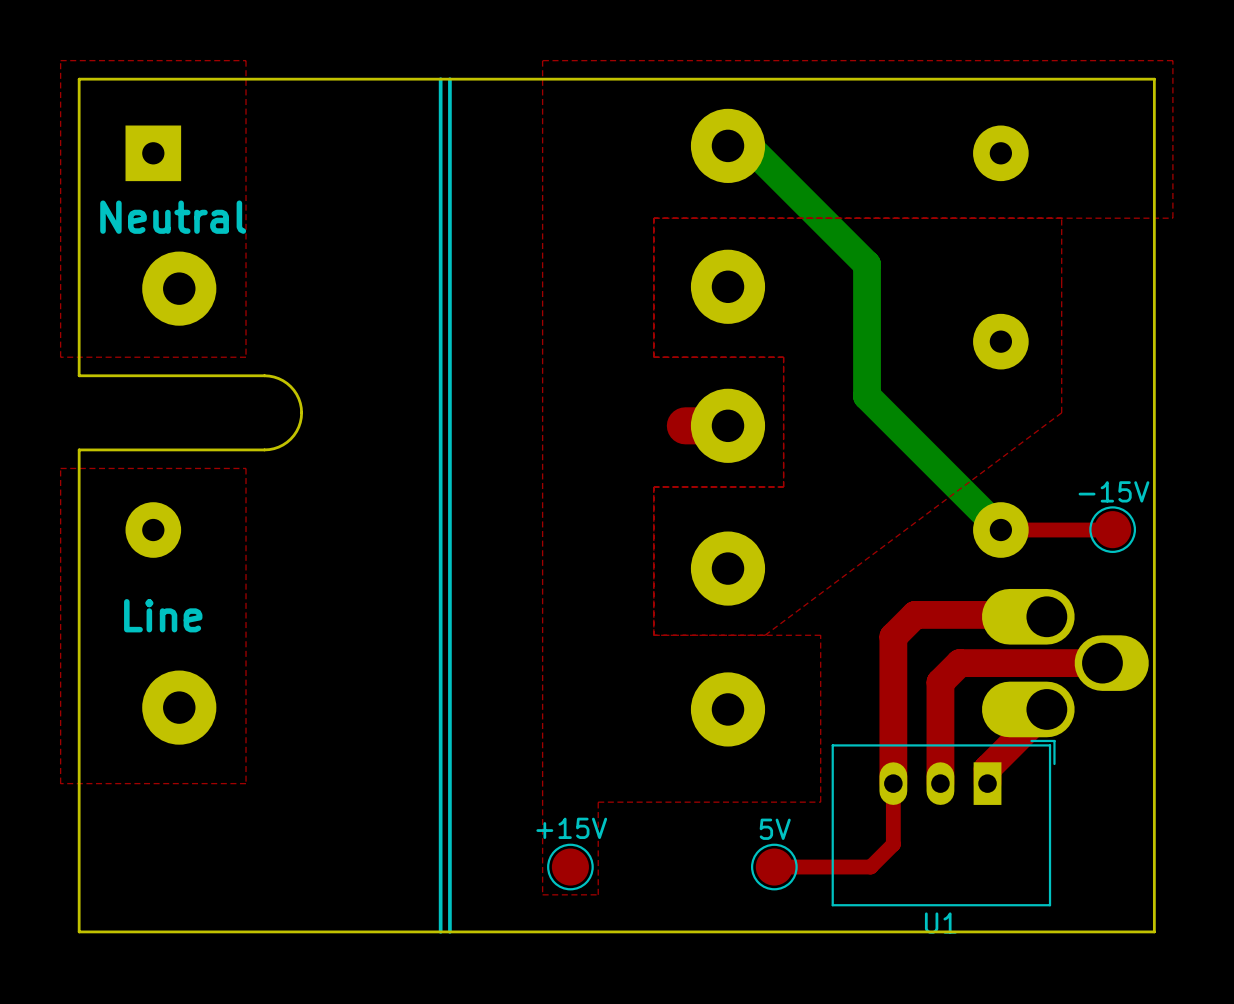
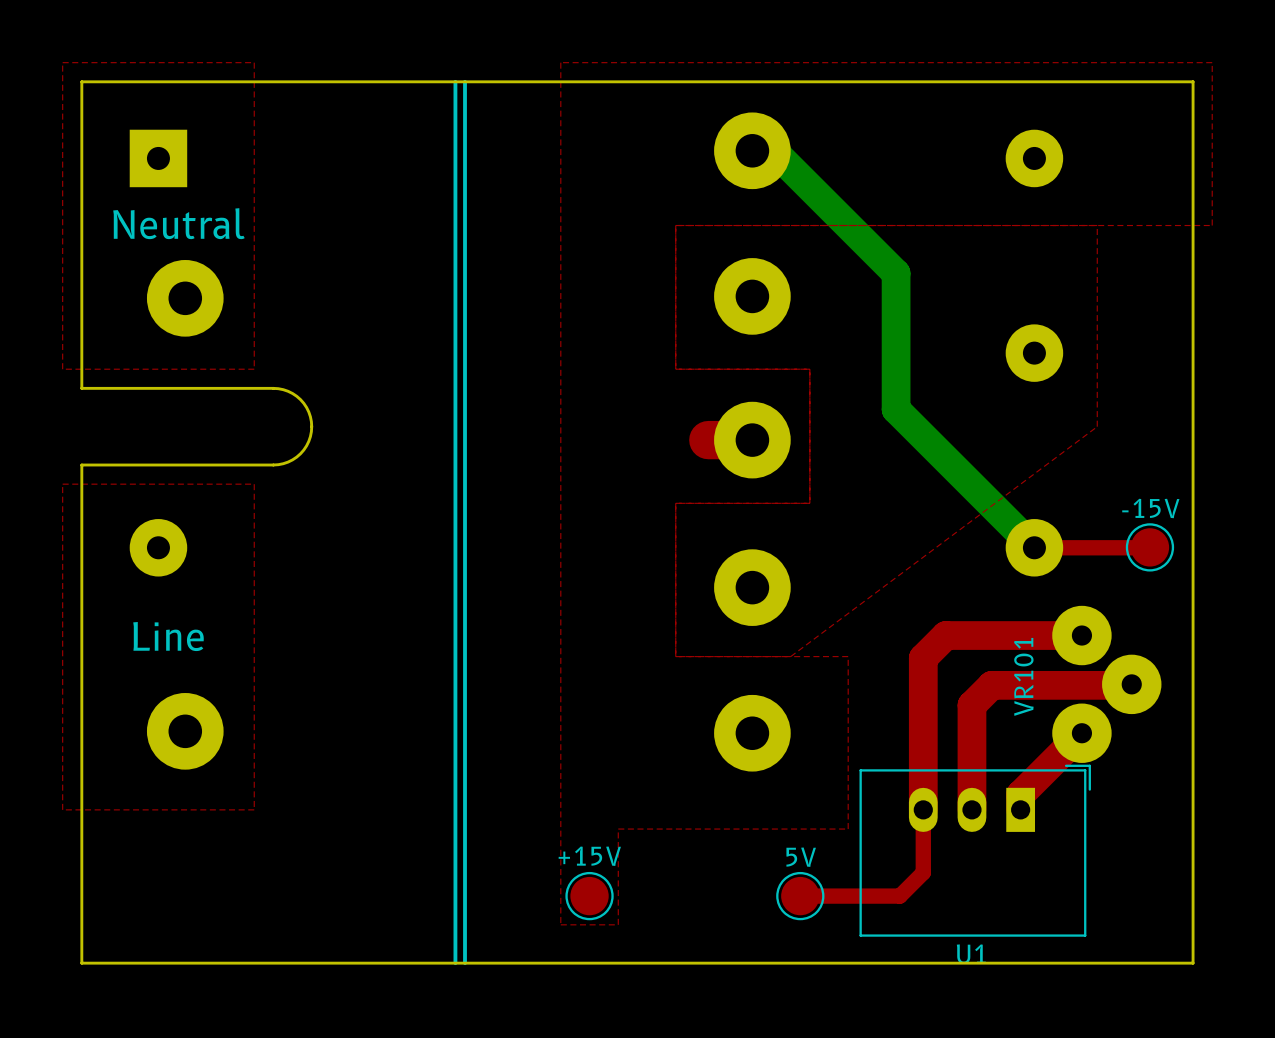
VR101: none -> (1106, 684)
part: (1065, 663) -> none

